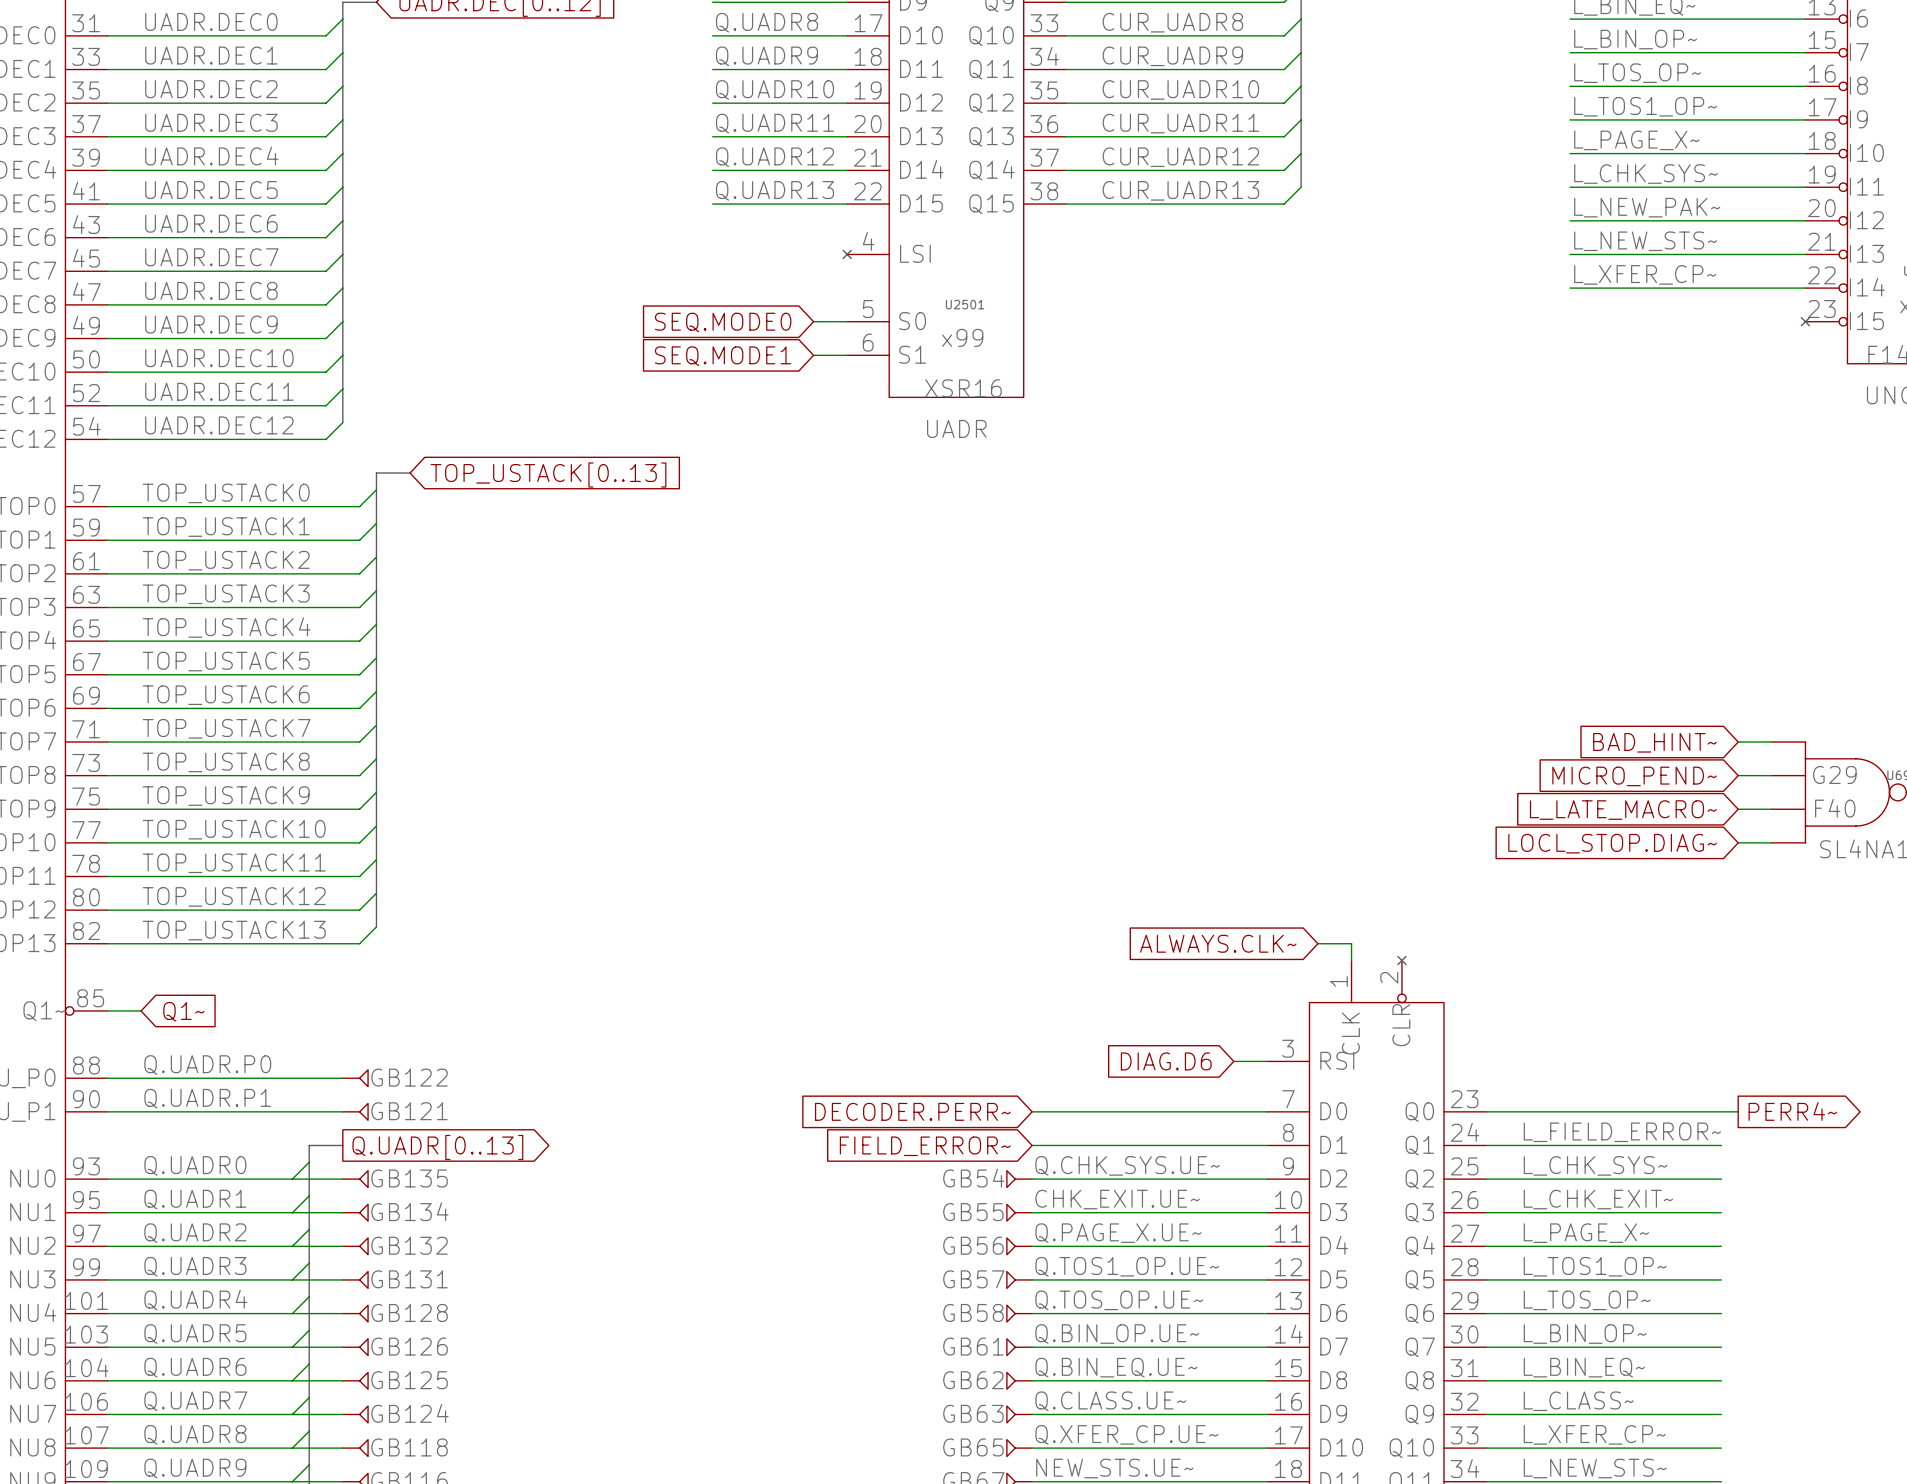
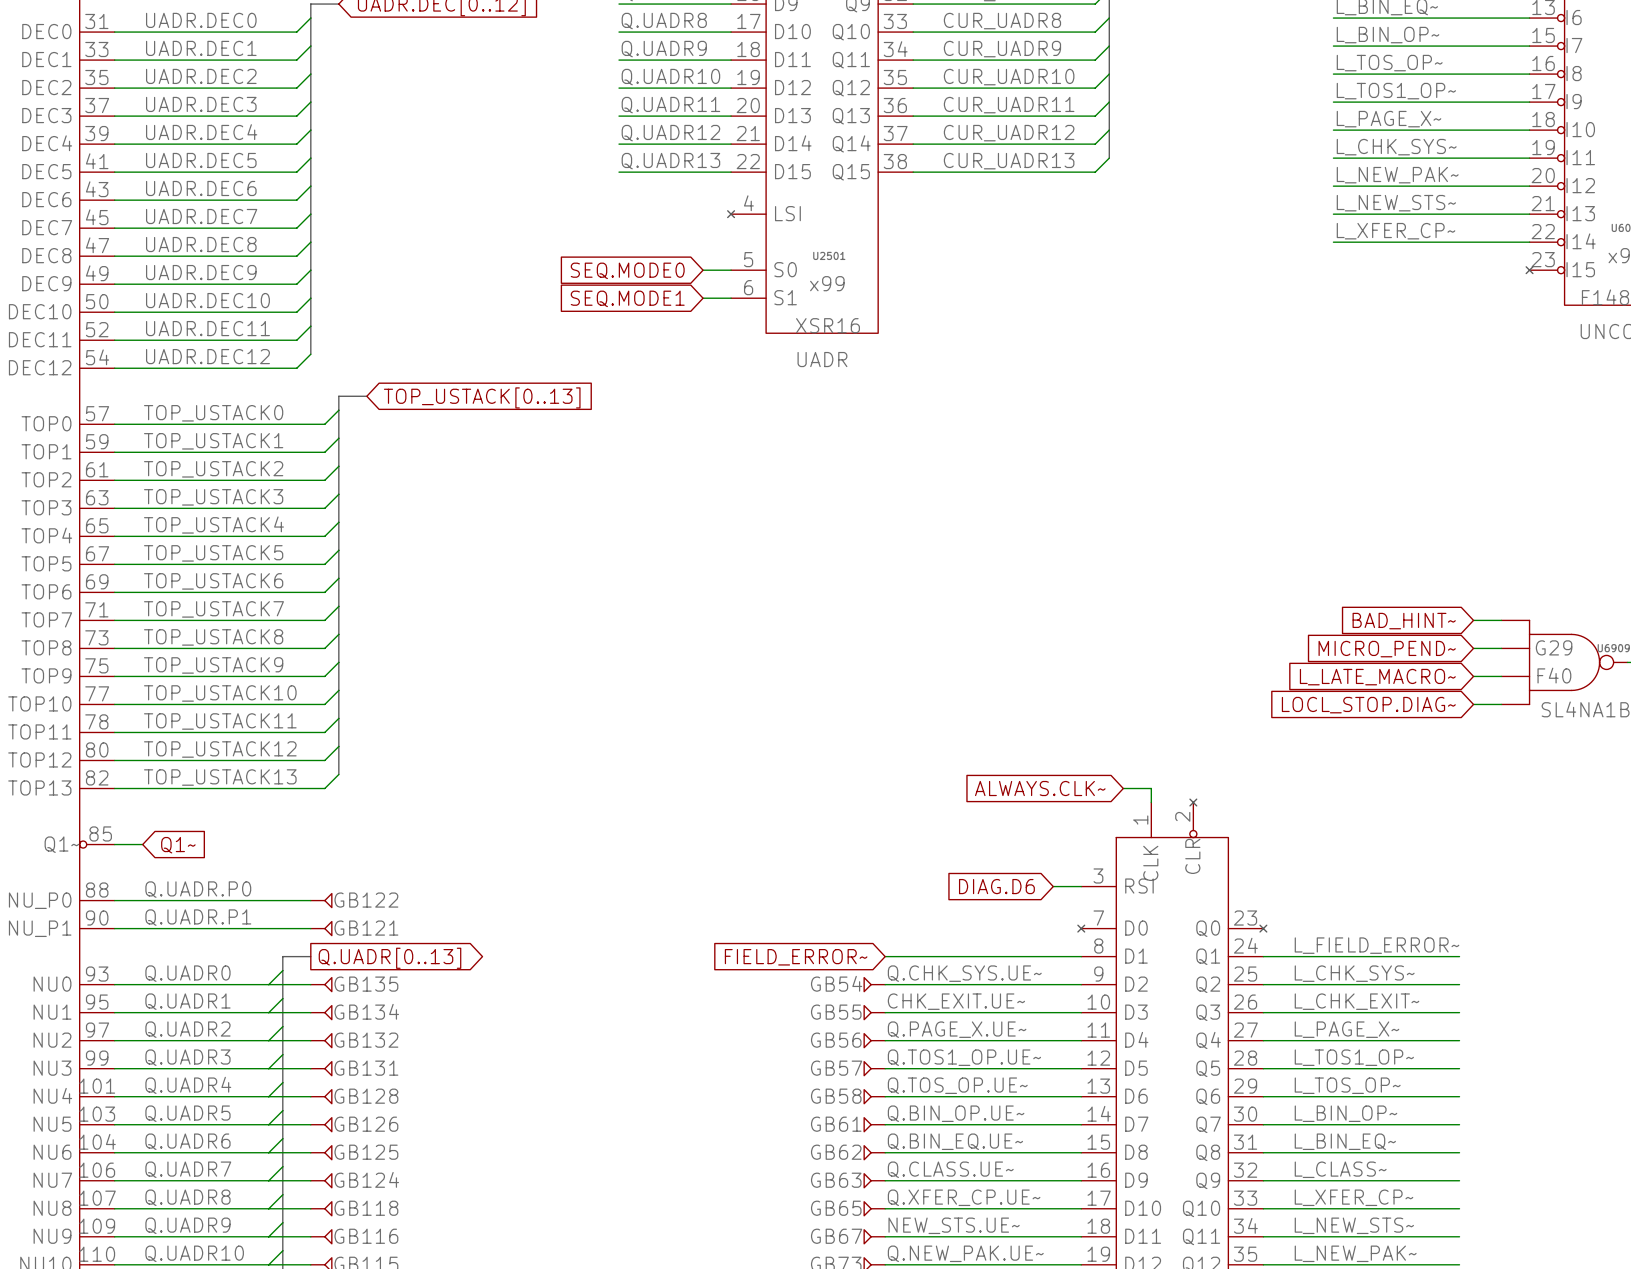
global label: DECODER.PERR~ (912, 1111) -> none
wire: (1032, 1111) (1267, 1111) -> none
no-connect mark: none -> (1081, 928)
wire: (1486, 1111) (1738, 1111) -> none
no-connect mark: none -> (1263, 928)
global label: PERR4~ (1792, 1111) -> none

